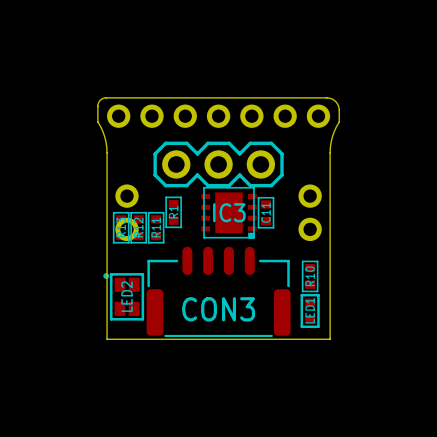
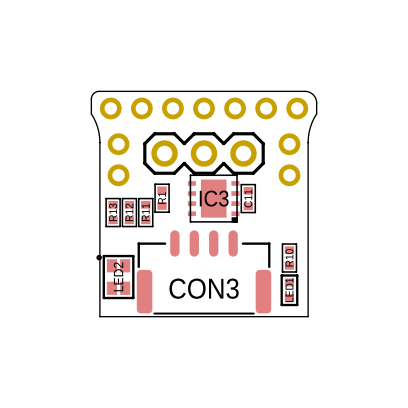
part position: (127, 212) -> (118, 159)
part position: (310, 212) -> (289, 159)

